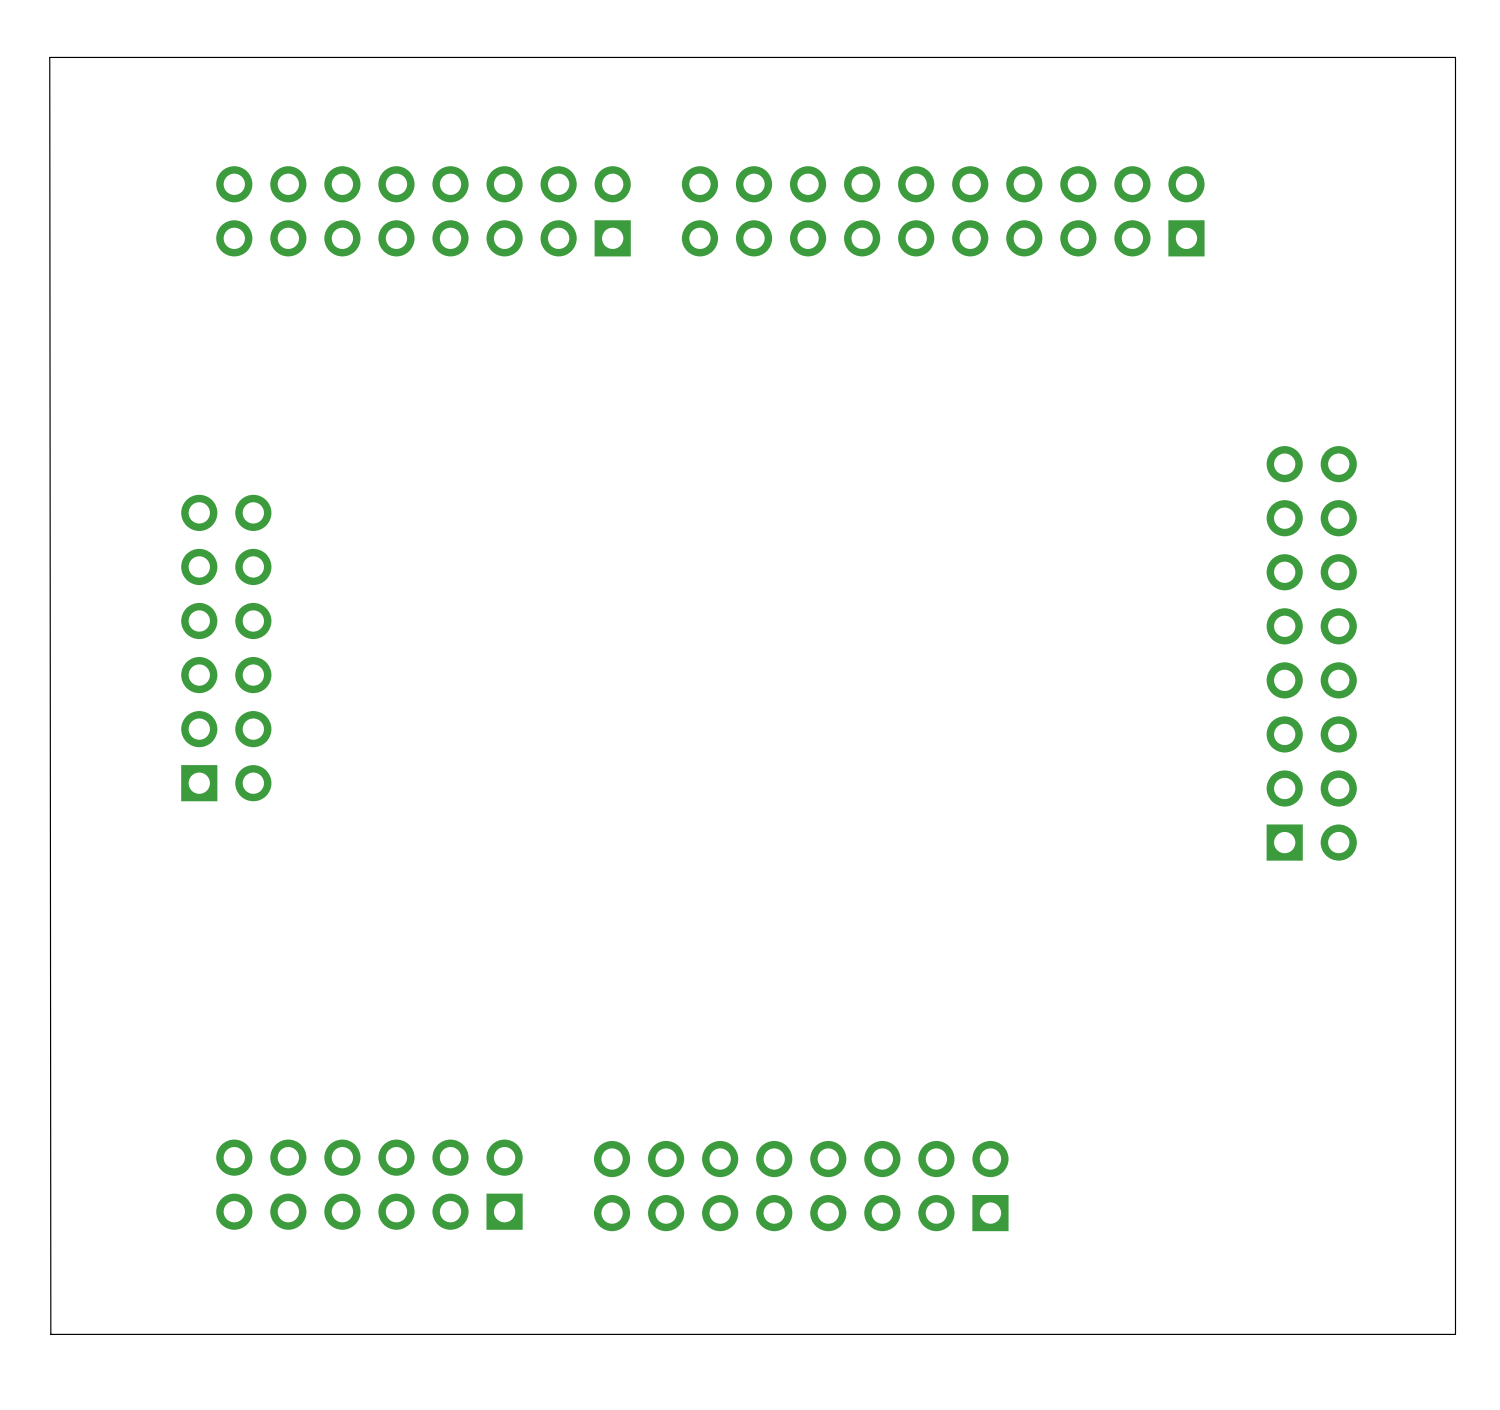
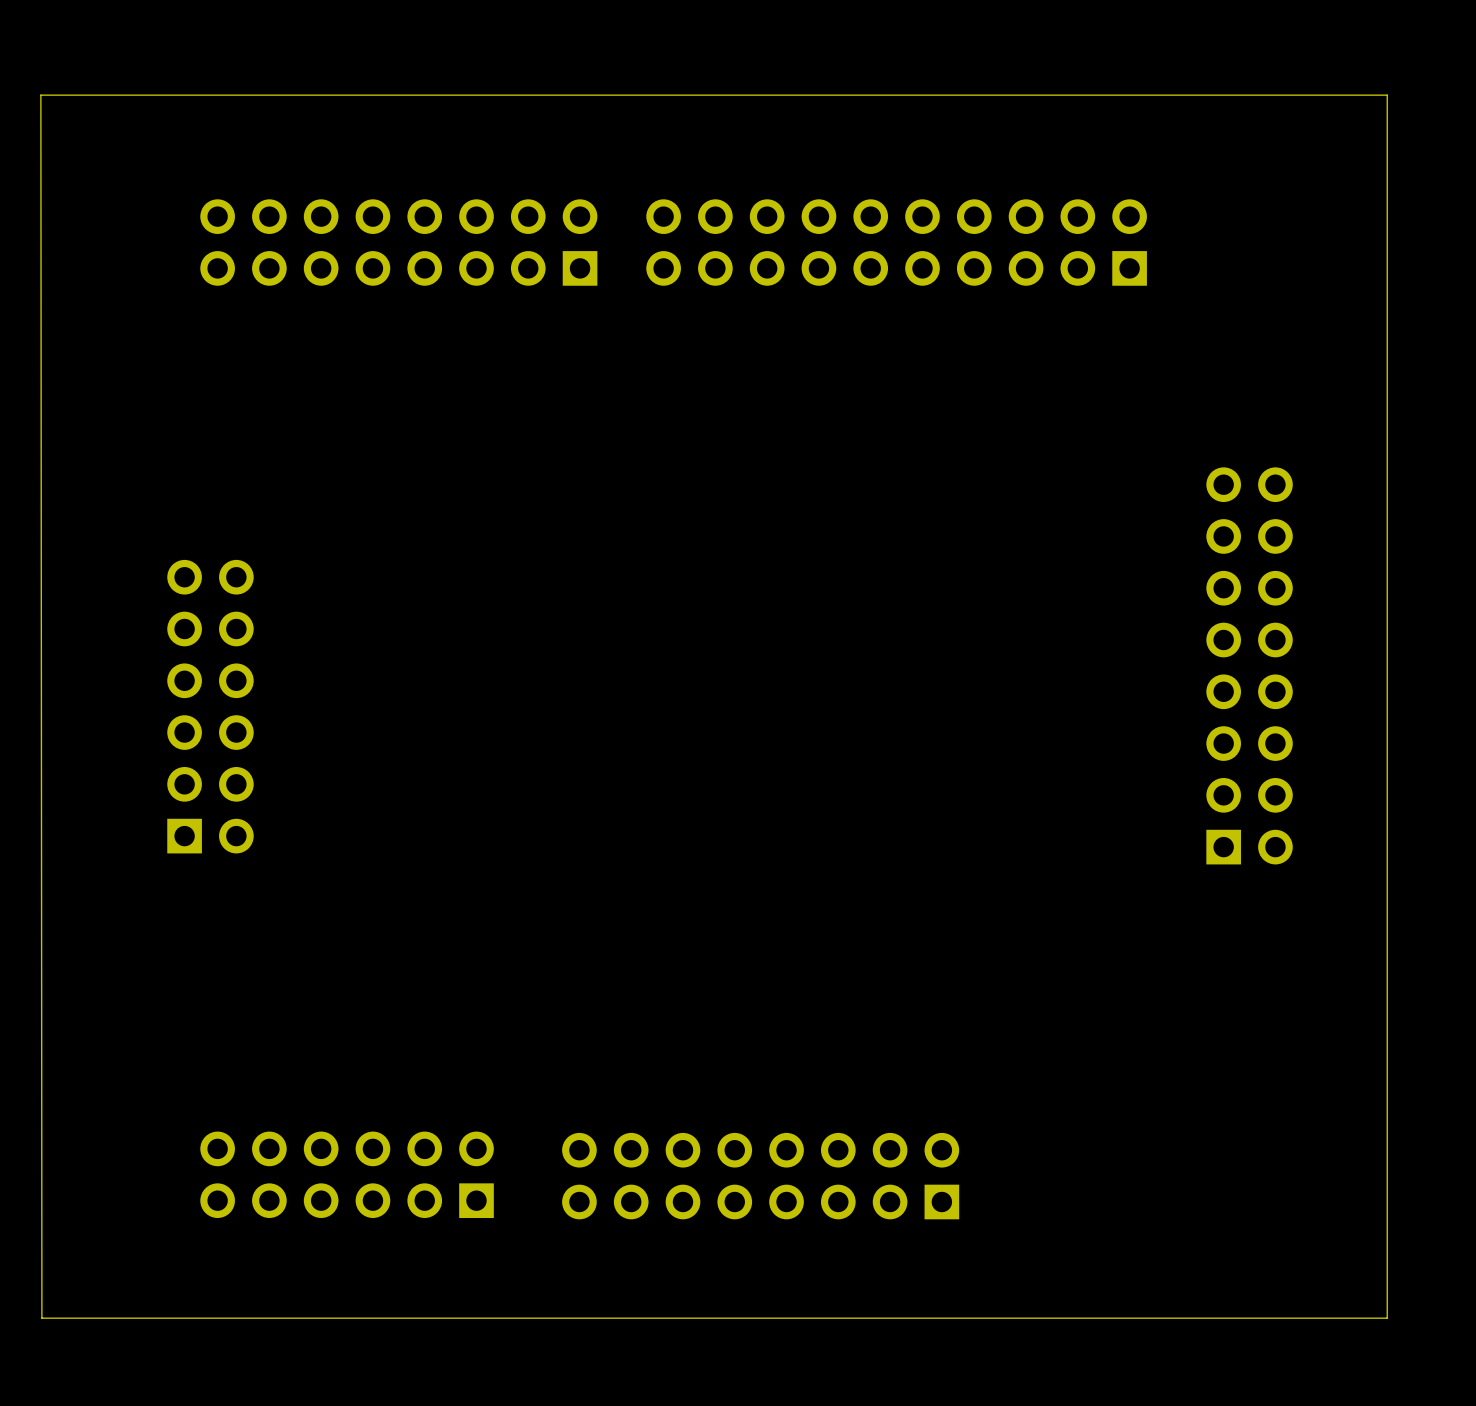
part position: (226, 648) -> (210, 706)

